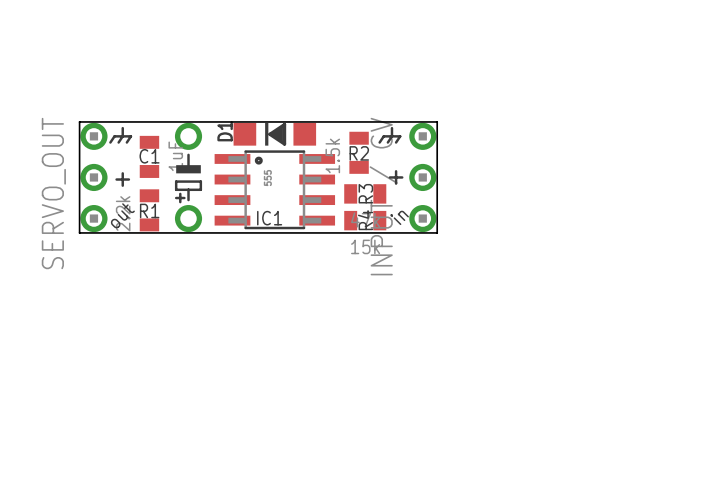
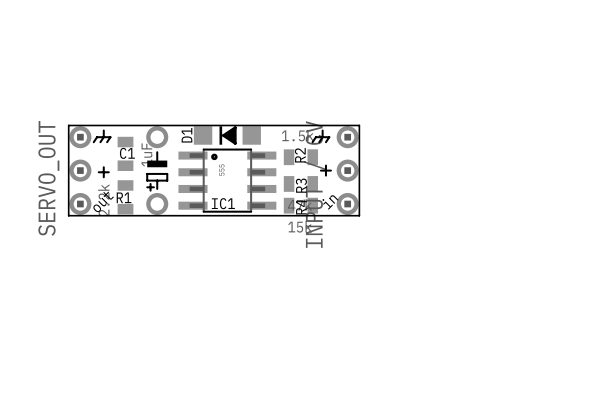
R2 rotation: 0° (359, 152) -> 90° clockwise (300, 157)

